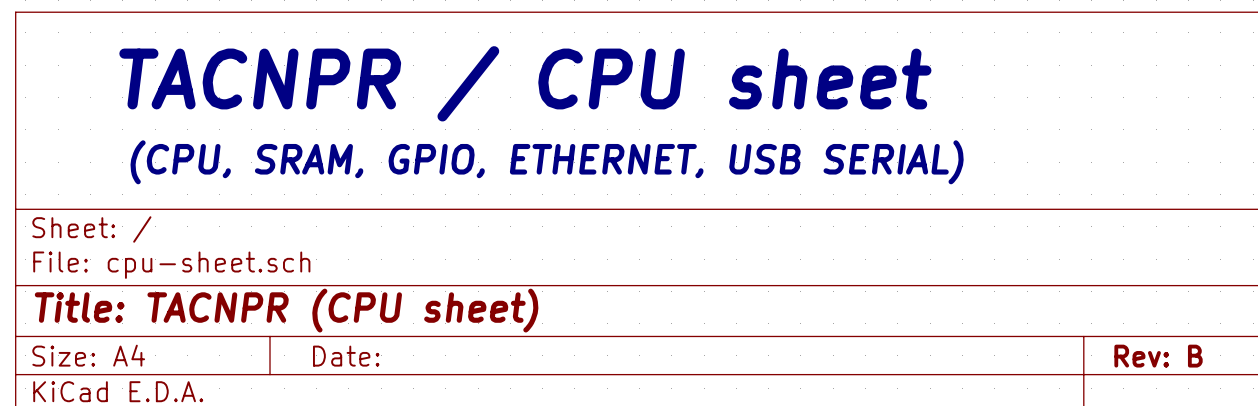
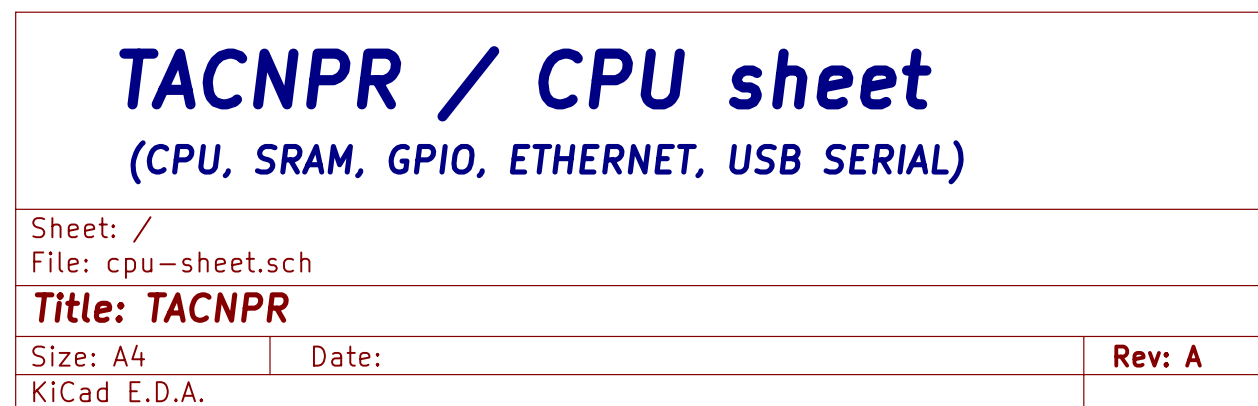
title block: Title: TACNPR (CPU sheet) (286, 310) -> Title: TACNPR (161, 307)
title block: Rev: B (1158, 356) -> Rev: A (1158, 356)

